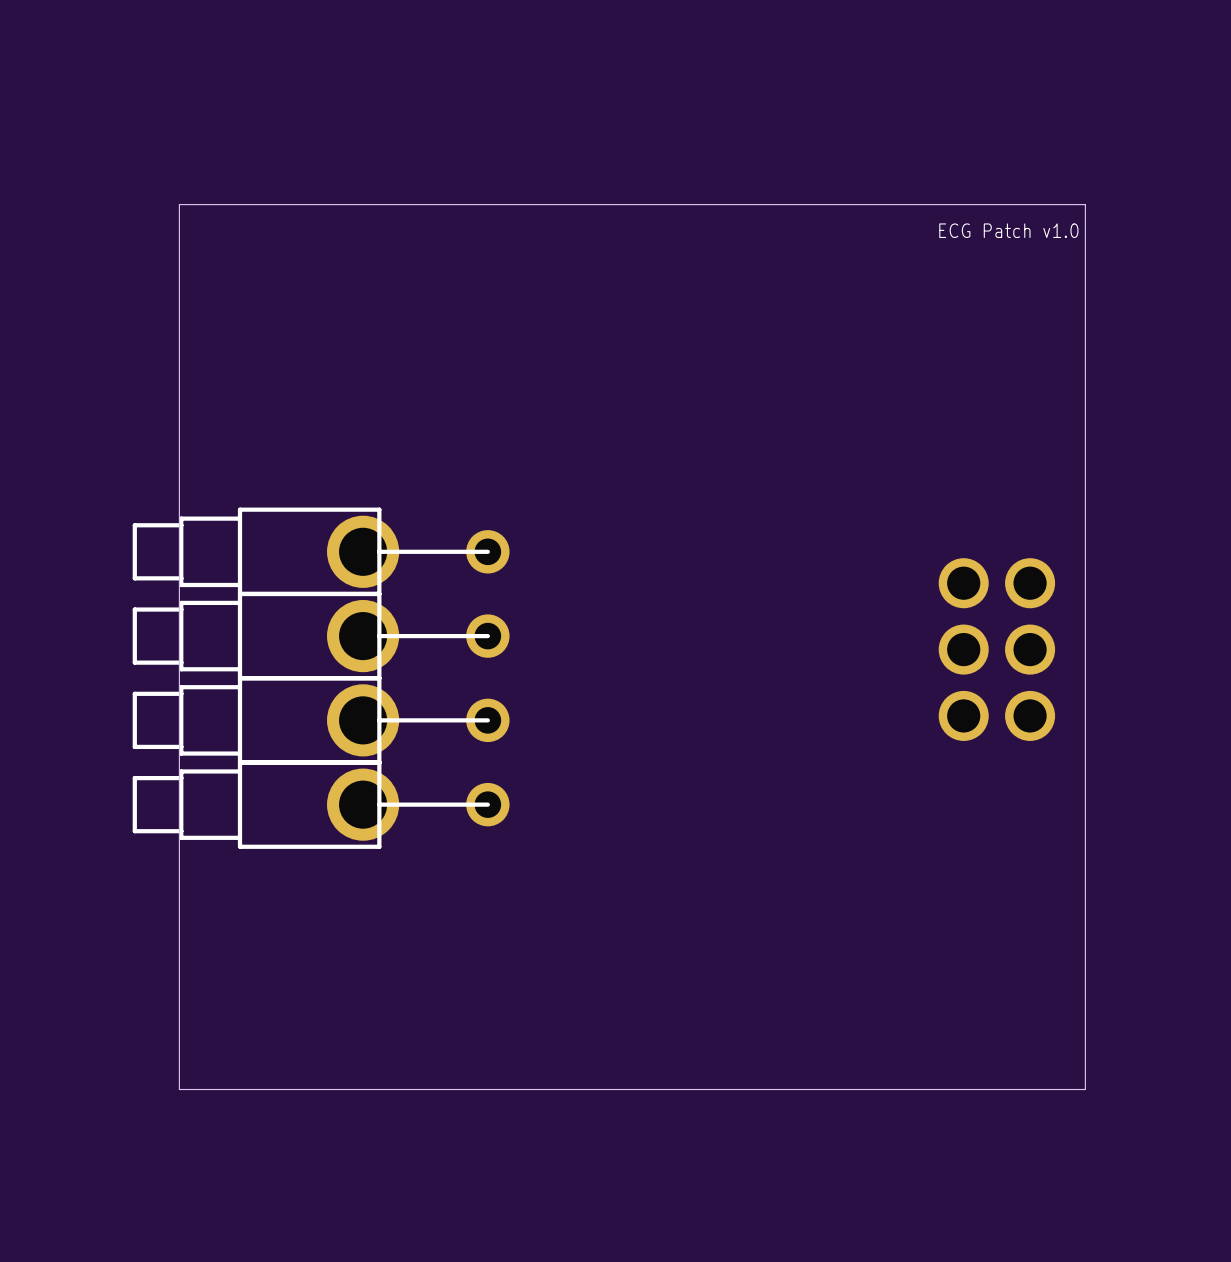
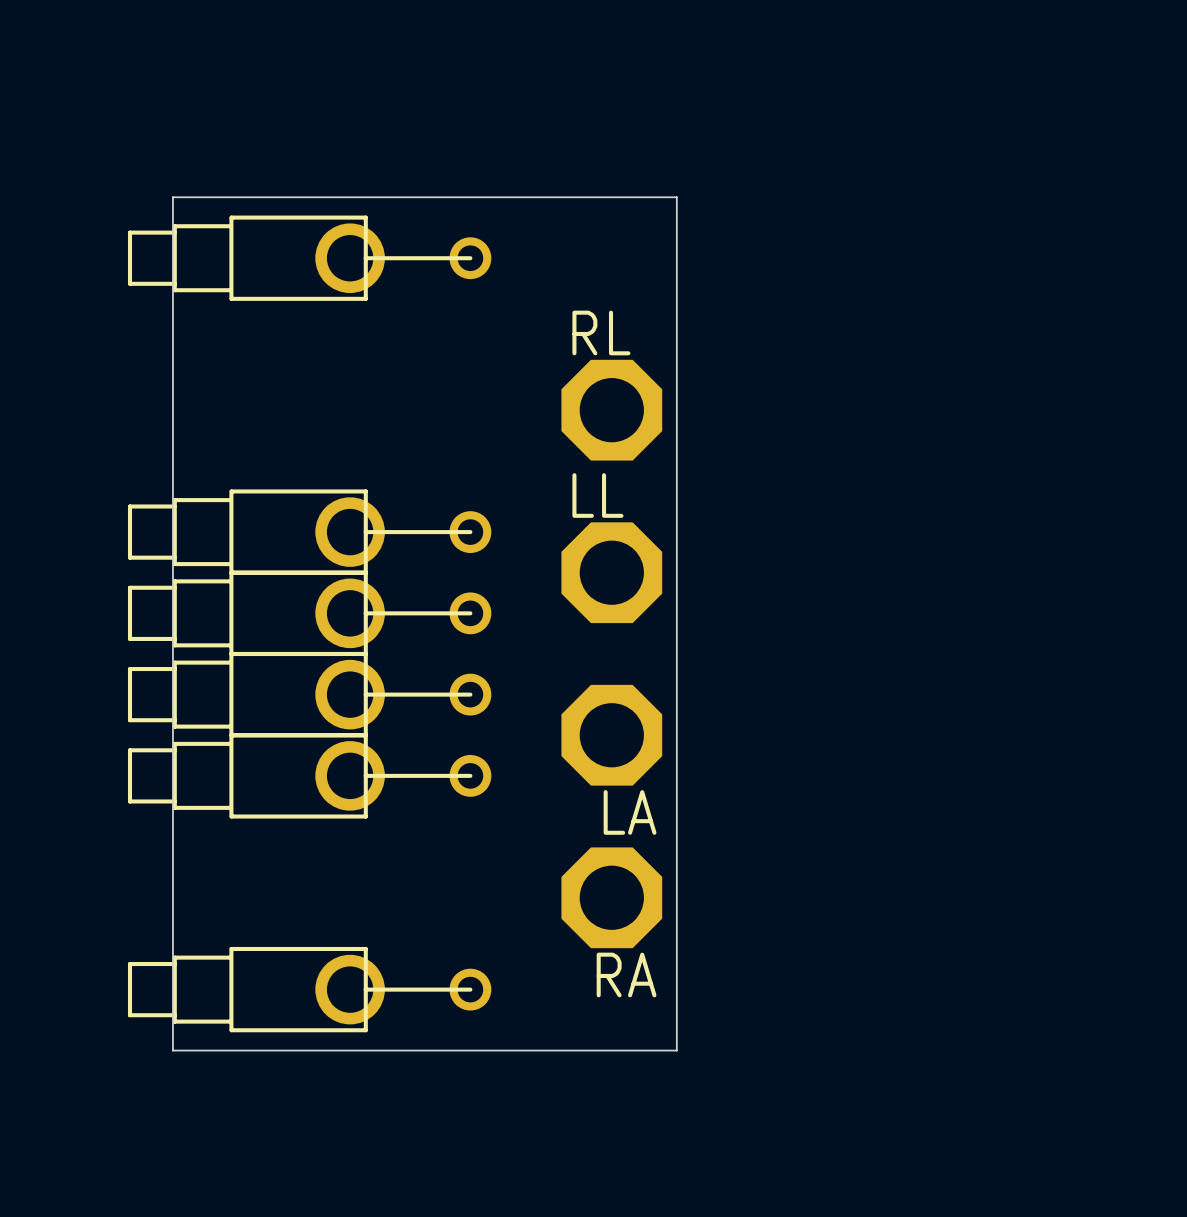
board edge: (701, 204) (1085, 204) (1085, 1089) (701, 1089) -> (676, 197) (676, 1050)
text: ECG Patch v1.0 (1008, 230) -> none
part: none -> (309, 258)
RL: none -> (611, 410)
LL: none -> (611, 572)
part: (996, 649) -> none
LA: none -> (611, 735)
RA: none -> (611, 897)
part: none -> (309, 989)

